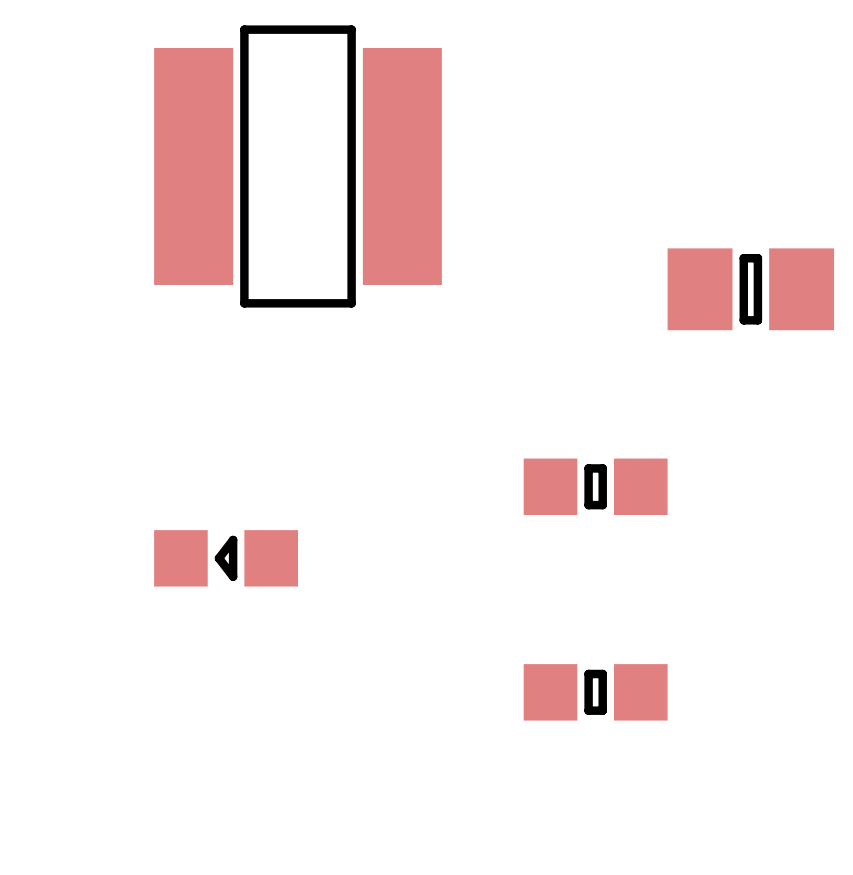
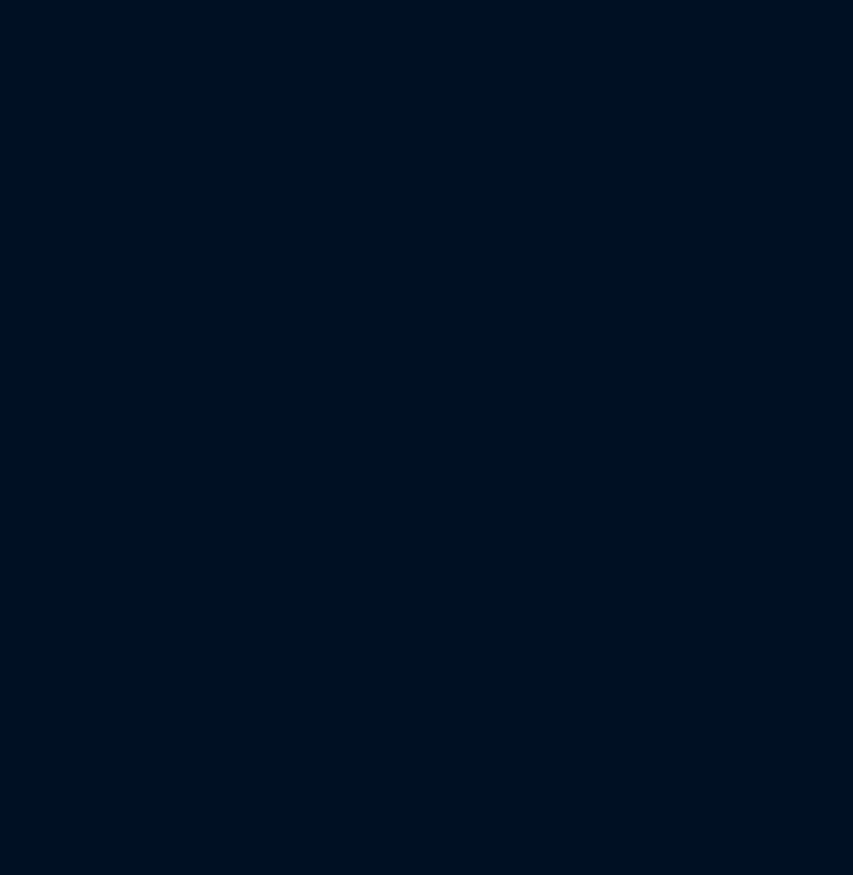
part: (298, 166) -> none
part: (750, 289) -> none
part: (595, 486) -> none
part: (226, 558) -> none
part: (595, 692) -> none

